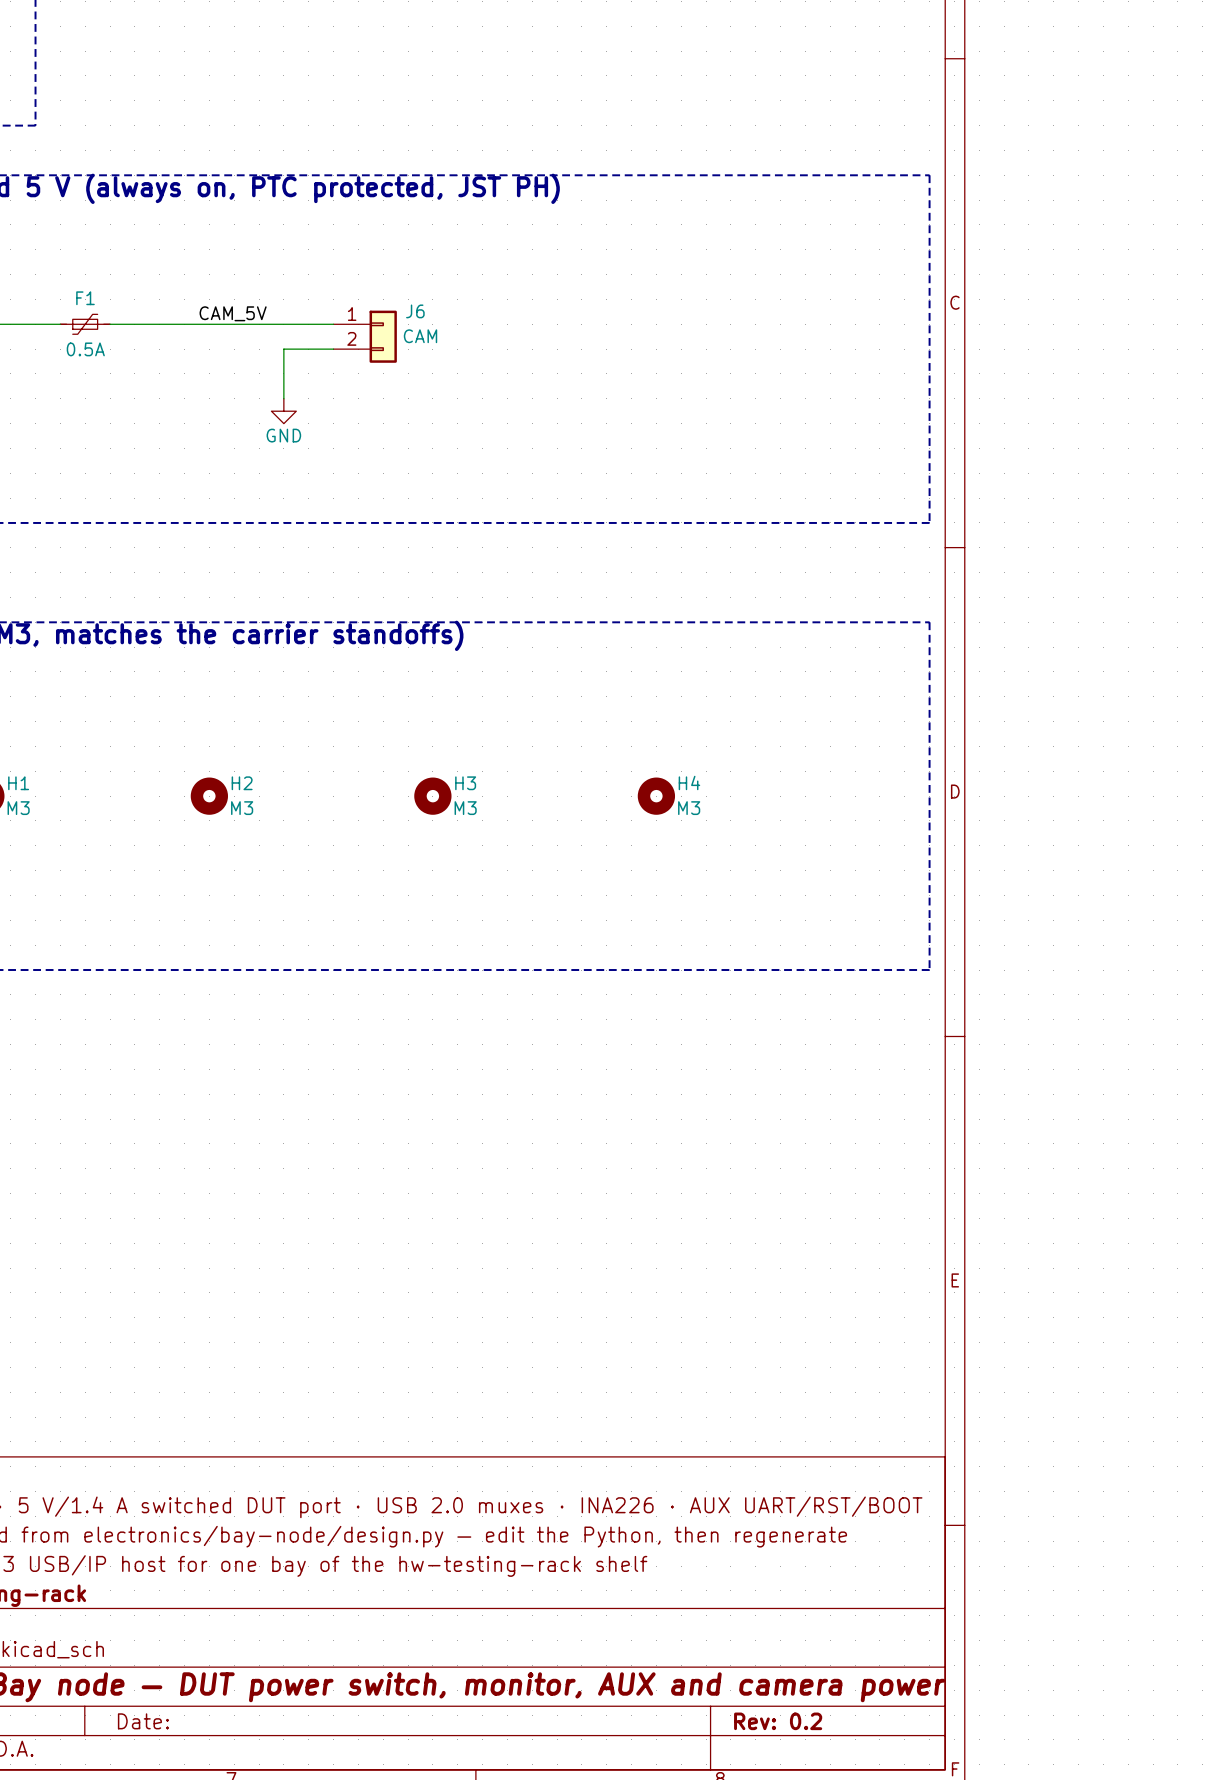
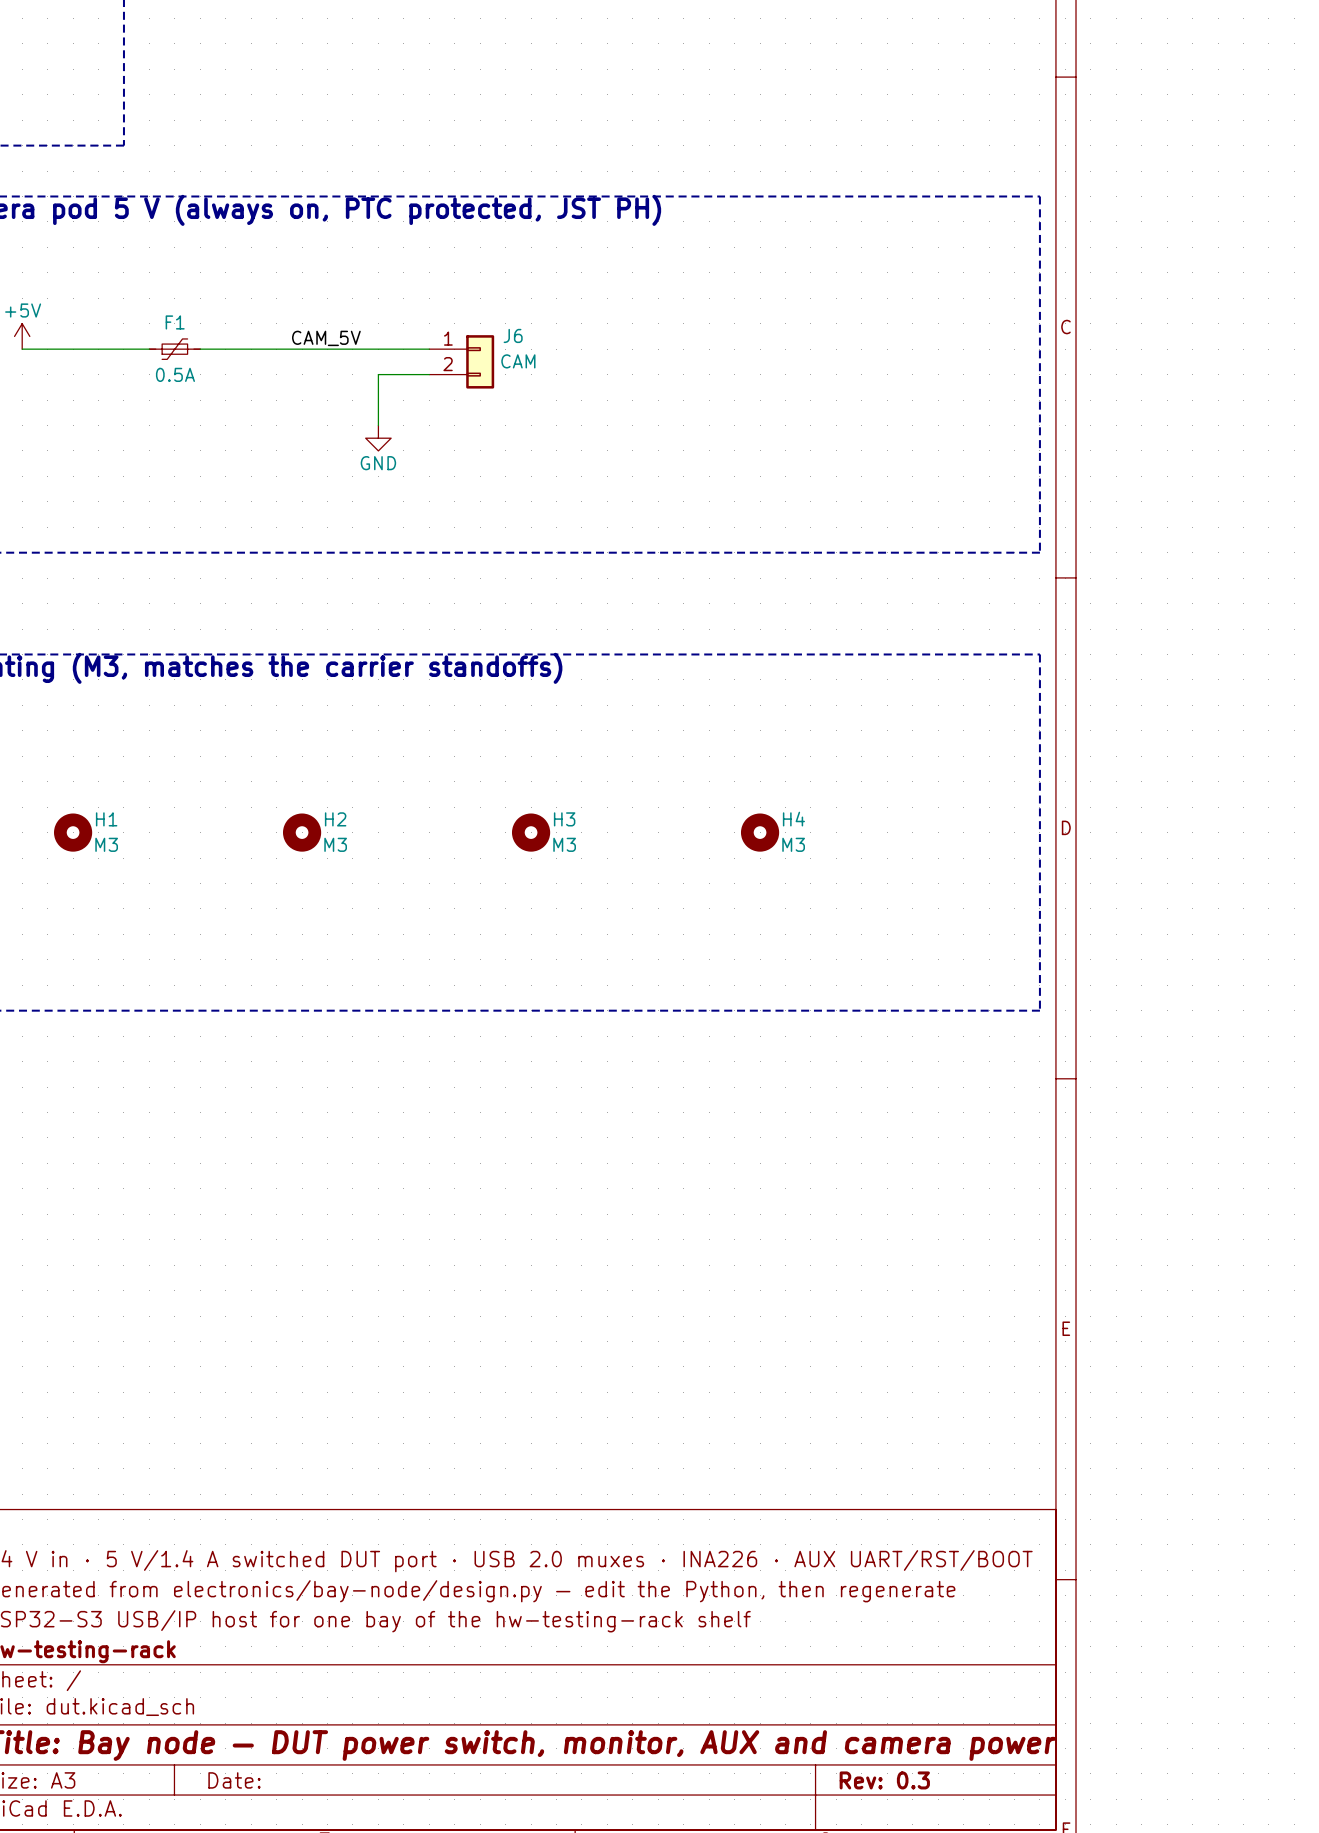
title block: Rev: 0.2 (778, 1721) -> Rev: 0.3 (884, 1780)

